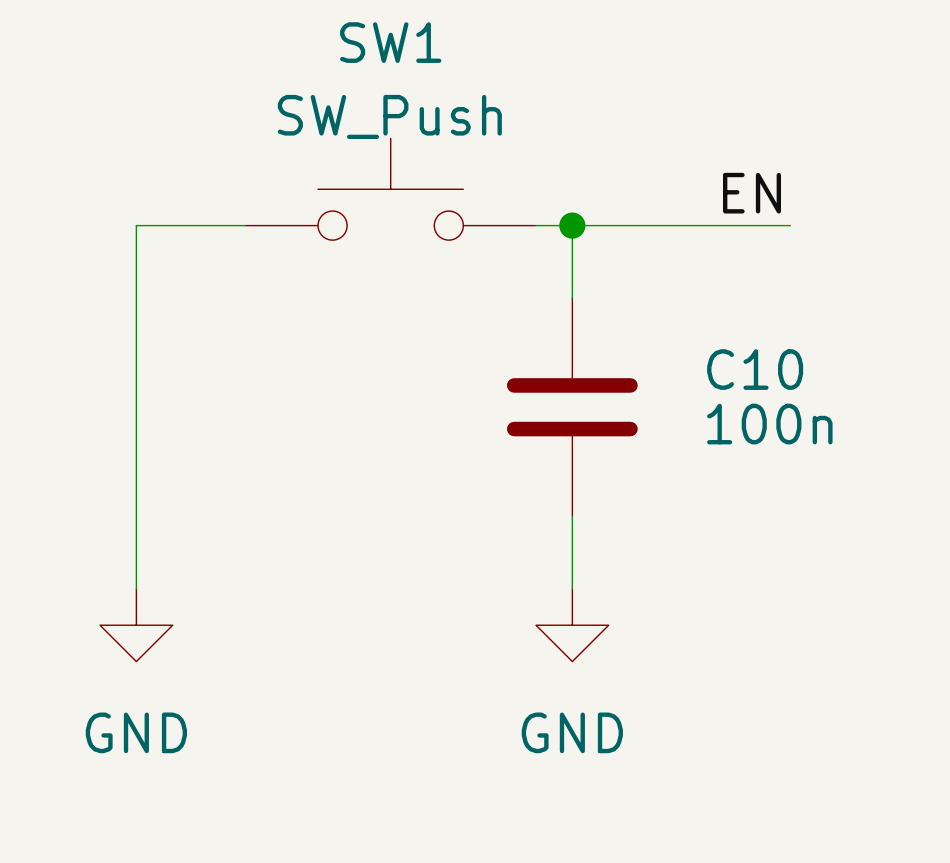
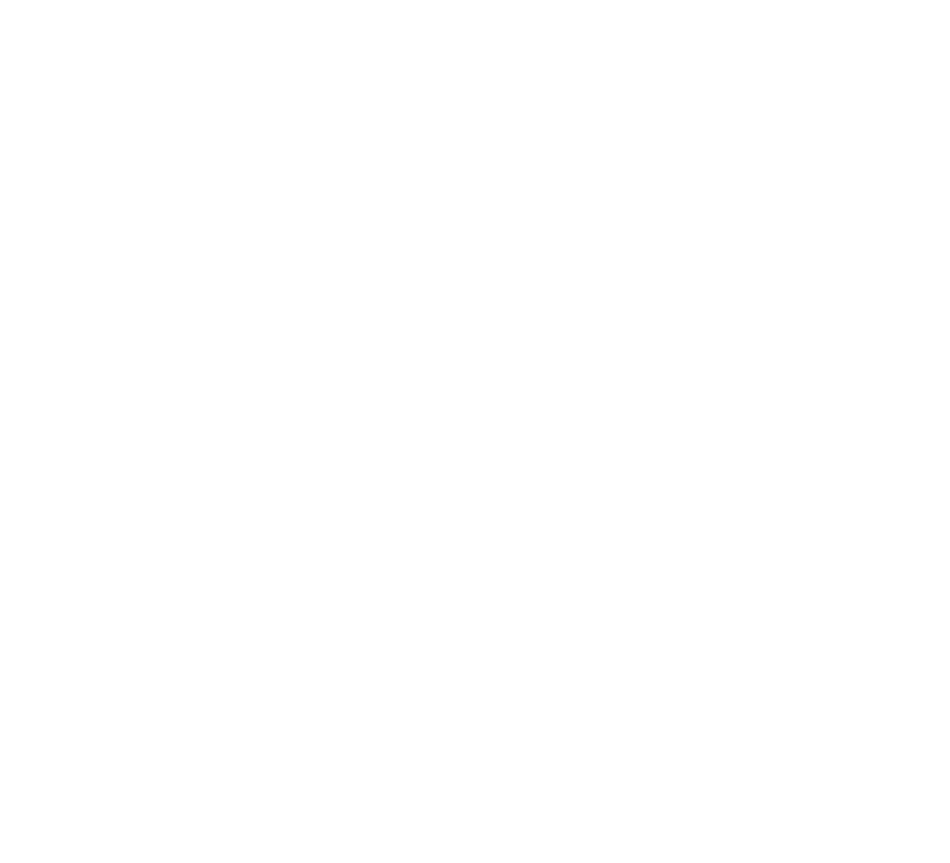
SW1: SW_Push (390, 189) -> none
label: EN (751, 193) -> none
wire: (245, 225) (136, 225) (136, 588) -> none
wire: (536, 225) (790, 225) -> none
wire: (572, 225) (572, 298) -> none
junction: (572, 225) -> none
C10: 100n (572, 407) -> none
wire: (572, 516) (572, 588) -> none
power symbol: GND (136, 625) -> none
power symbol: GND (572, 625) -> none

